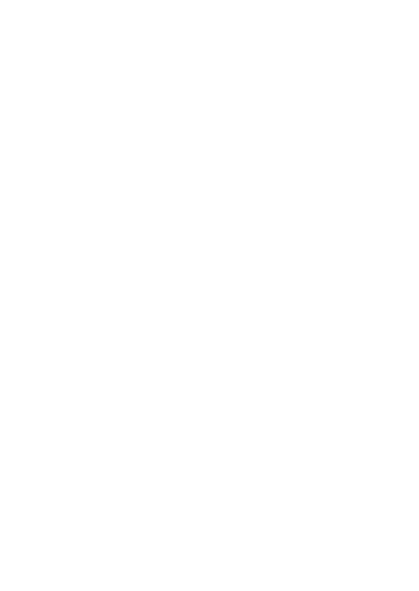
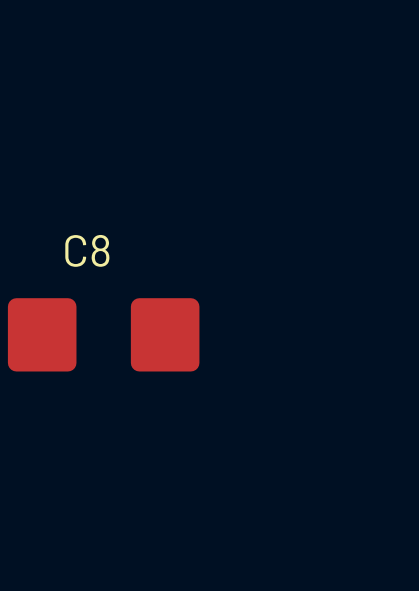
C8: none -> (103, 334)

